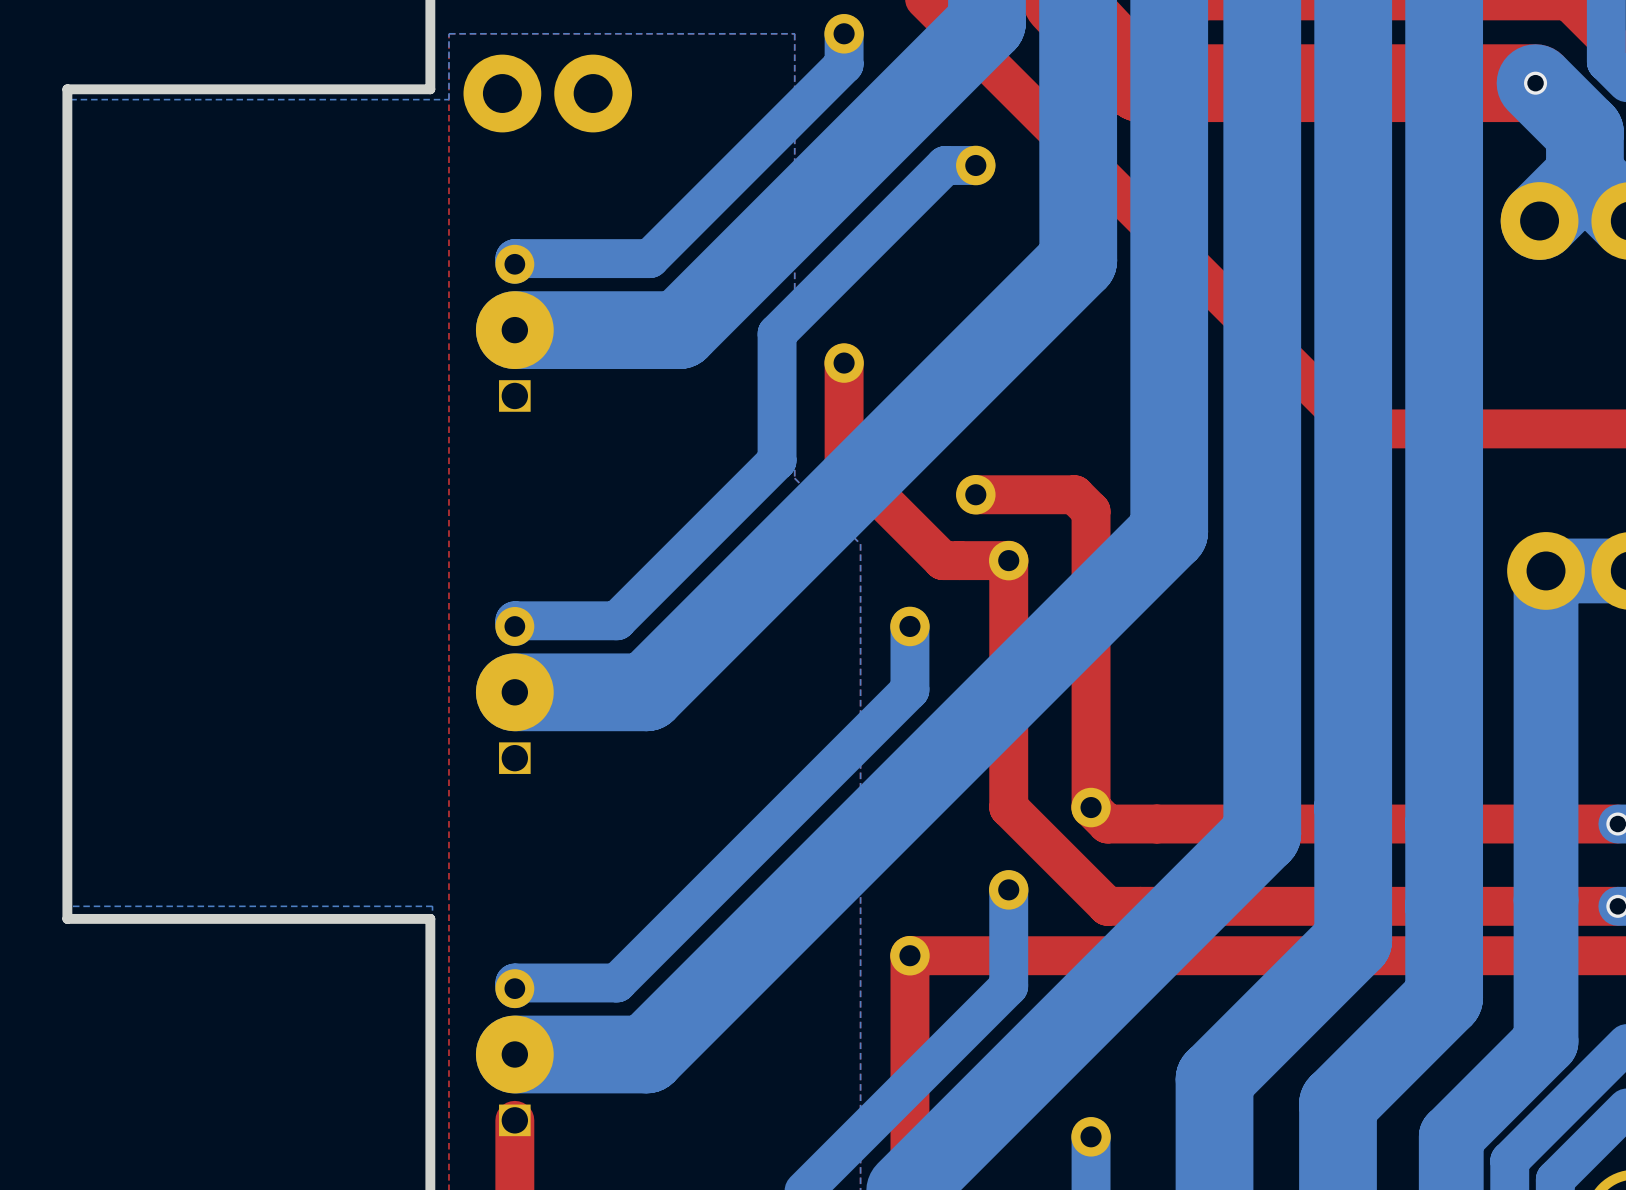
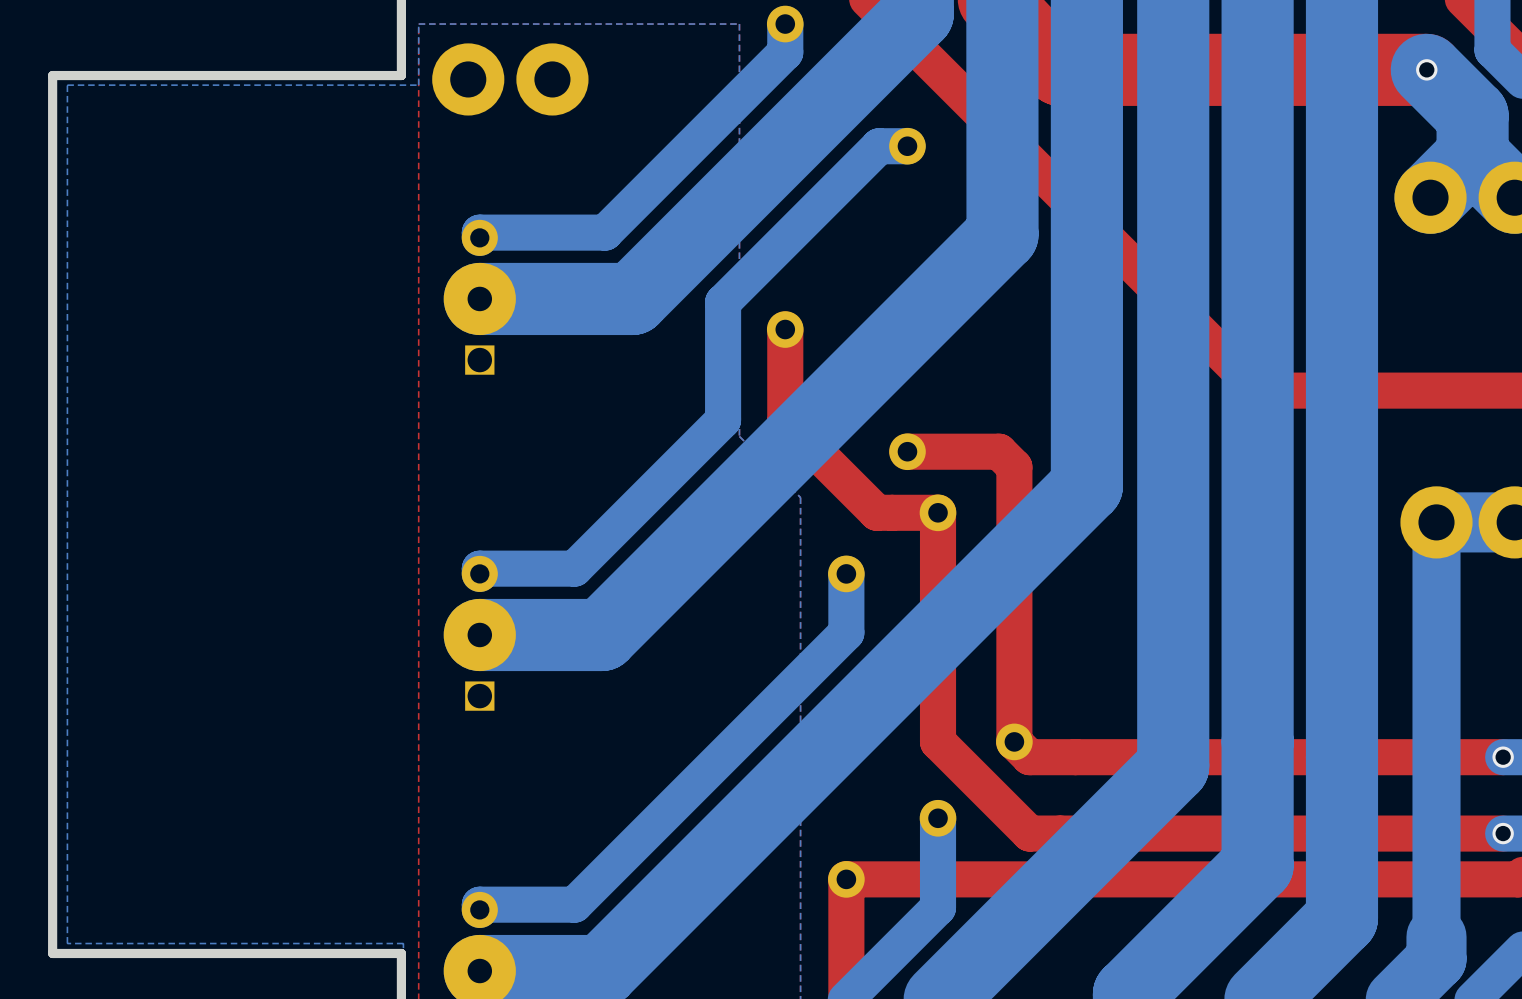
board edge: (67, 89) (67, 918) (430, 918) (430, 1035) -> (64, 75) (52, 75) (52, 953) (401, 953)
bottom track width: thick (1546, 570) (1546, 1017) -> thin (1436, 522) (1436, 936)
bottom zone outline: (70, 906) (432, 906) (432, 1024) -> (67, 833) (67, 943) (403, 943)

